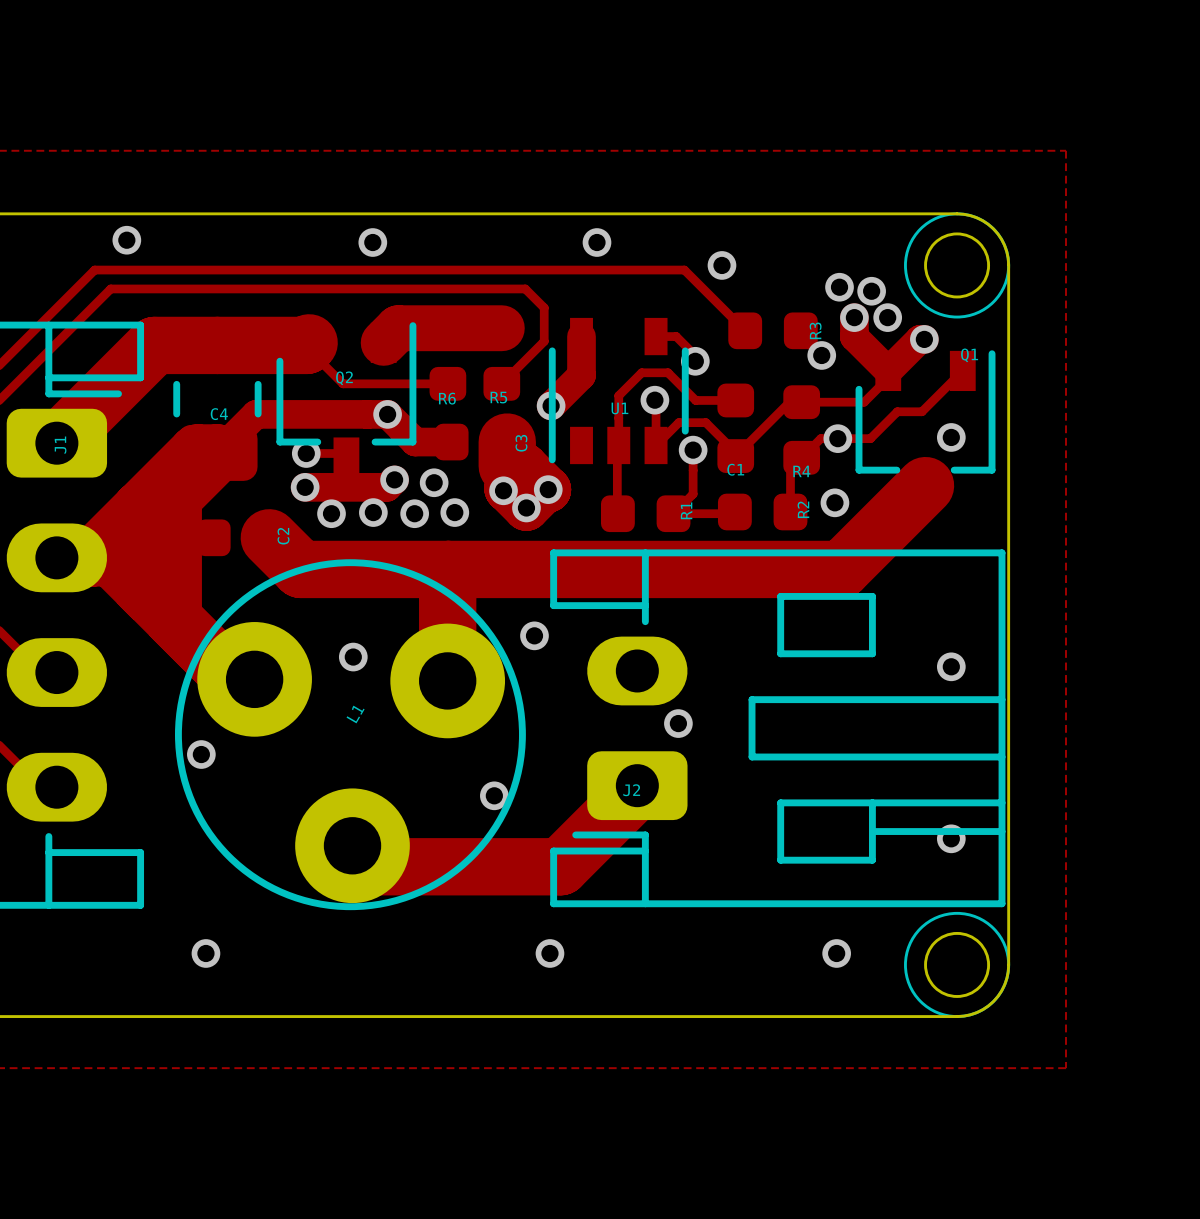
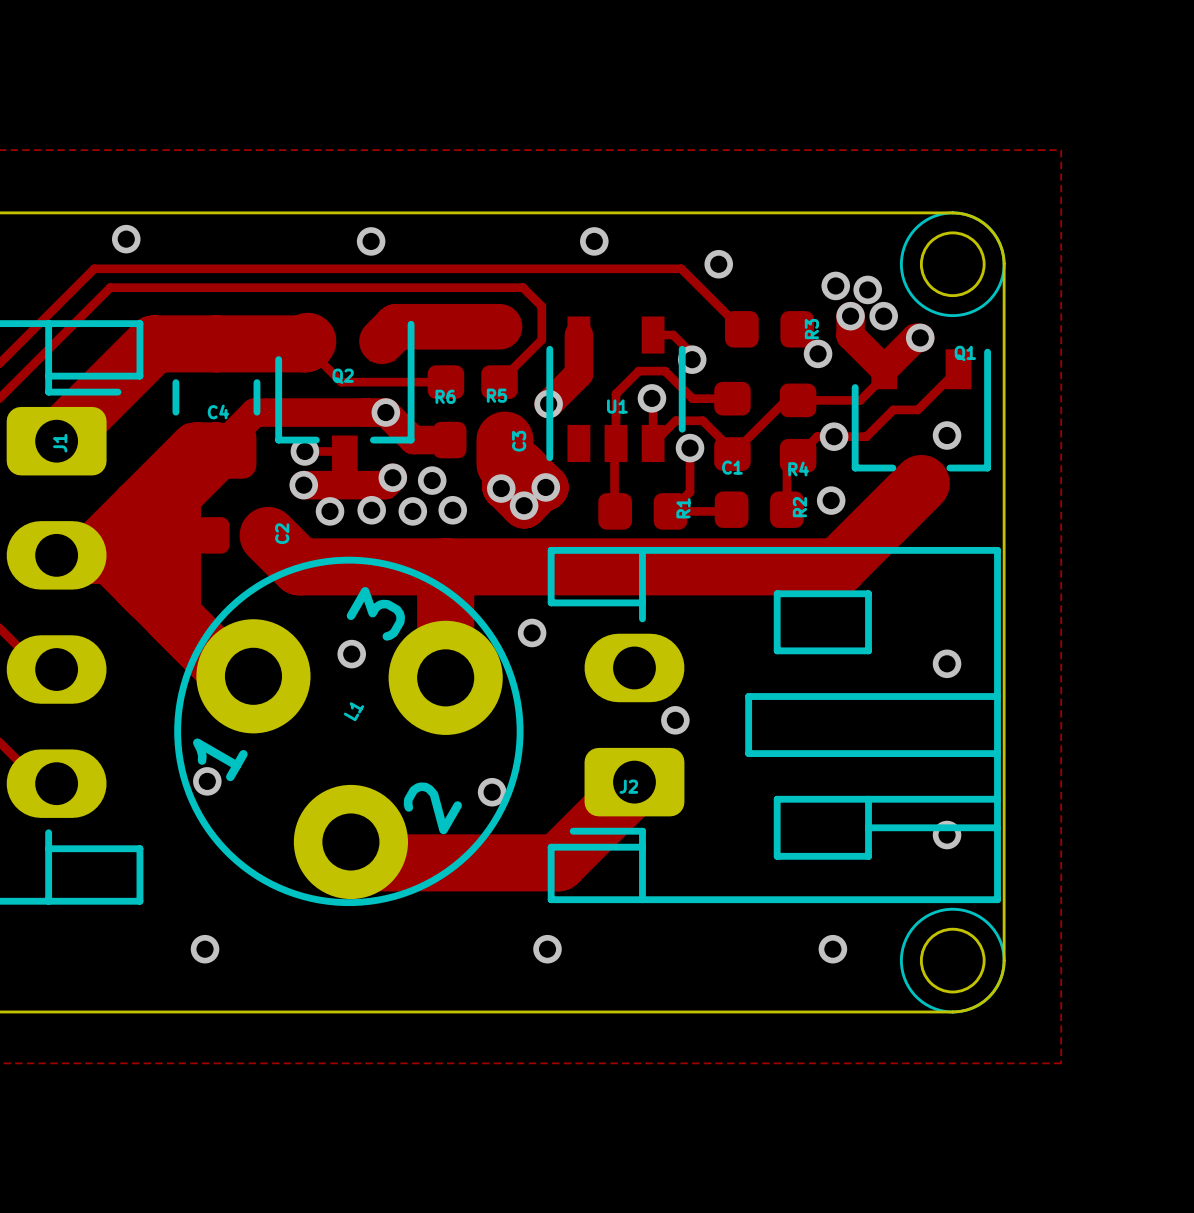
L1 text: none -> 3 (375, 613)
via position: (201, 754) -> (207, 781)
L1 text: none -> 1 (220, 759)
L1 text: none -> 2 (432, 808)

